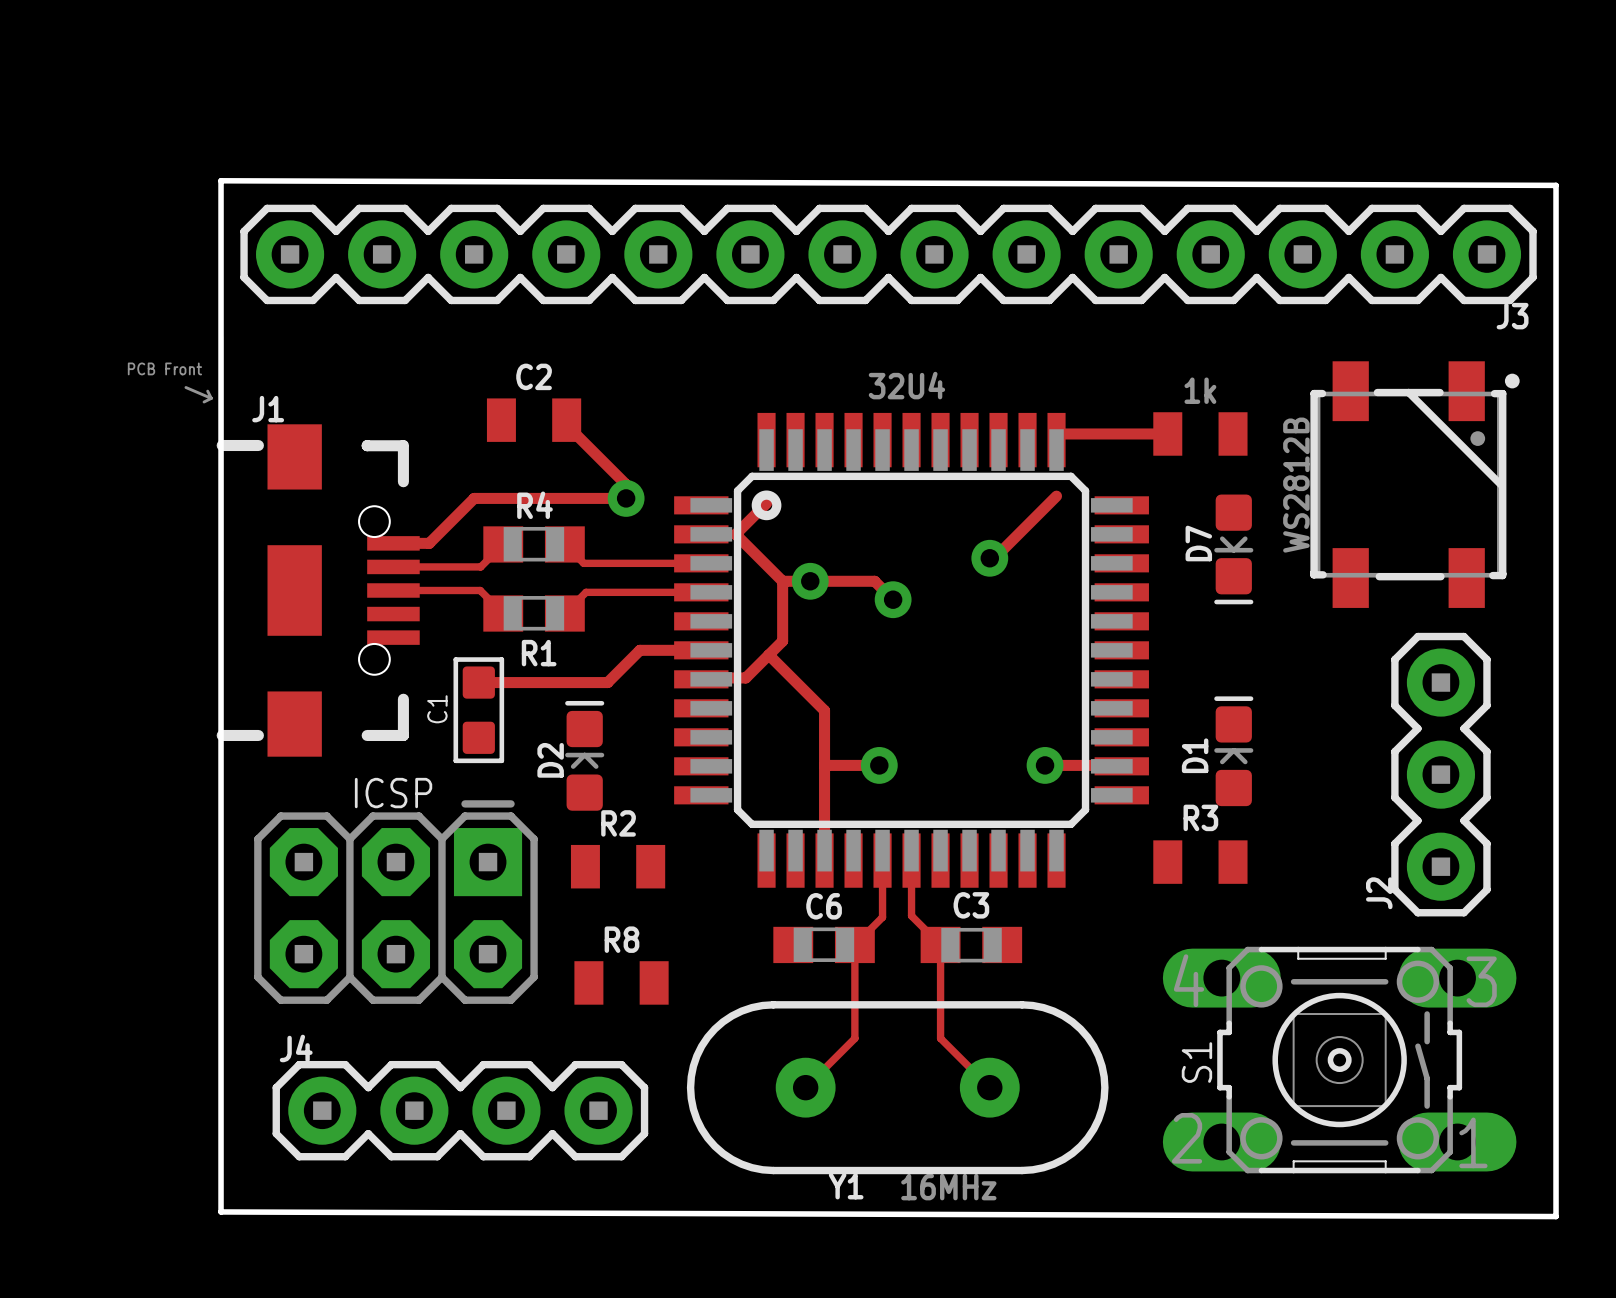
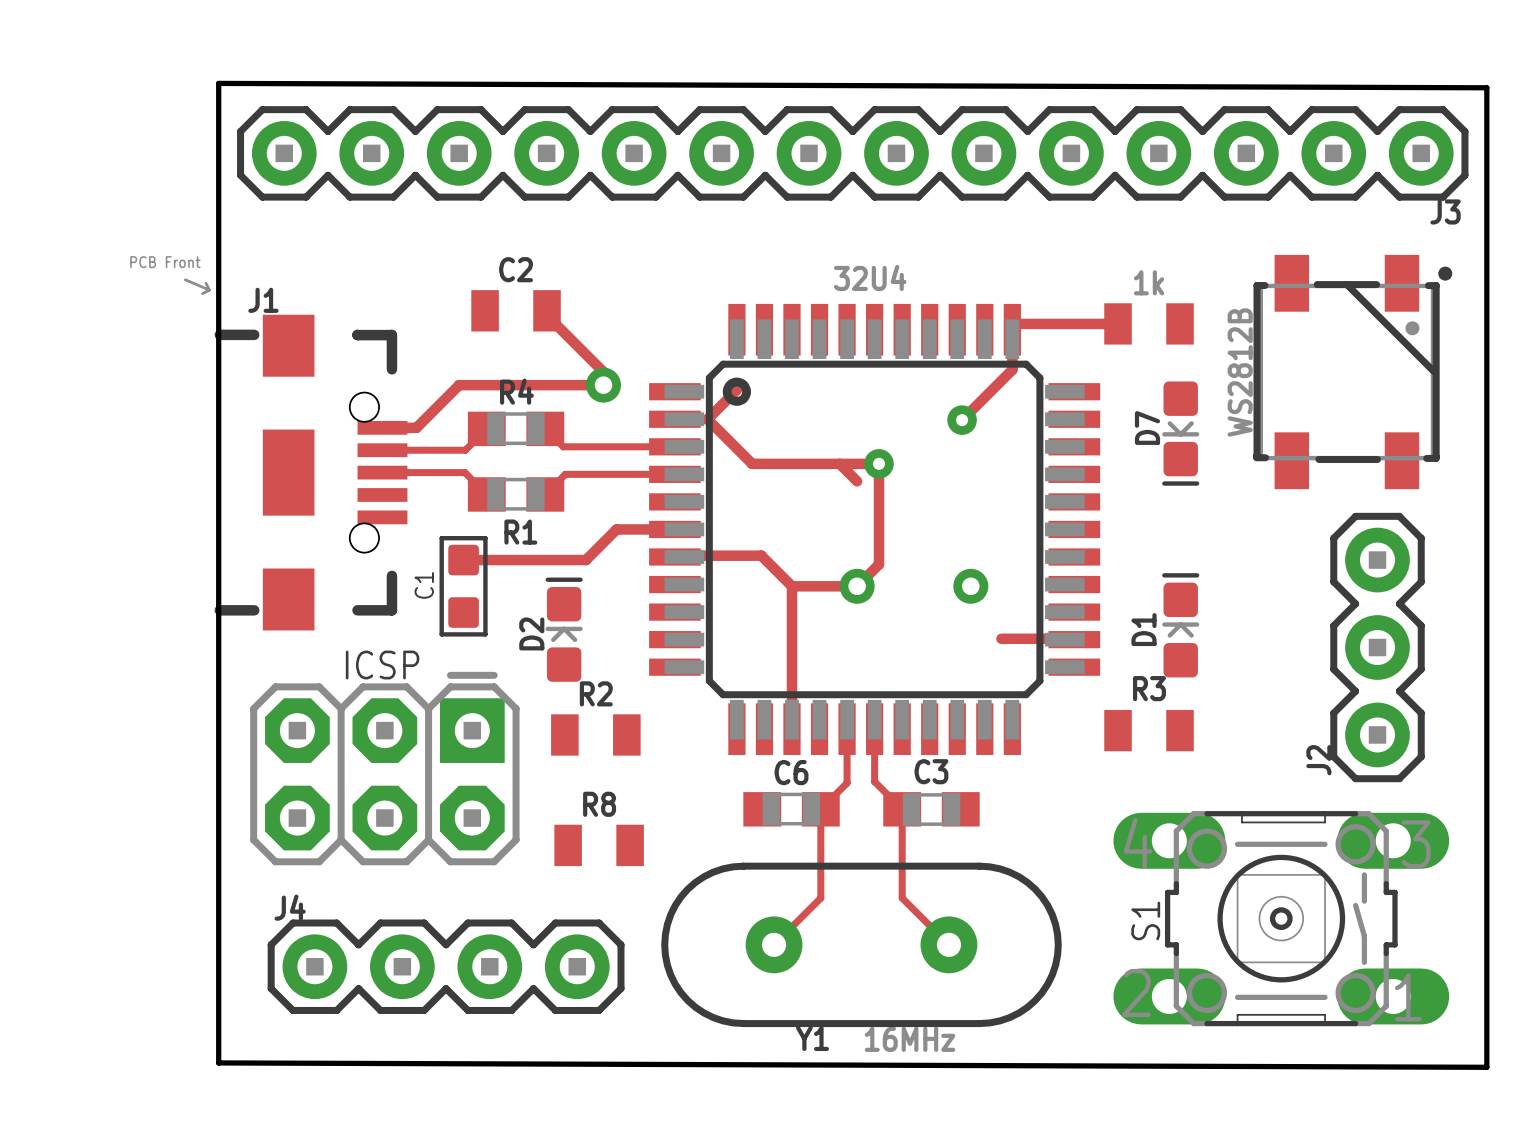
track: none -> (1012, 329) (1012, 369) (962, 420)
track: (1056, 496) (994, 558) (989, 558) -> none
via position: (989, 558) -> (962, 420)
track: (782, 581) (782, 641) (745, 677) -> (839, 463) (878, 463) (878, 564) (857, 586) (791, 586) (761, 555) (717, 555)
via: (810, 581) -> none
via position: (893, 599) -> (878, 463)
track: (768, 654) (824, 710) -> none
via: none -> (857, 586)
track: (824, 765) (879, 765) -> none
via: (879, 765) -> none
via position: (1045, 765) -> (970, 586)

